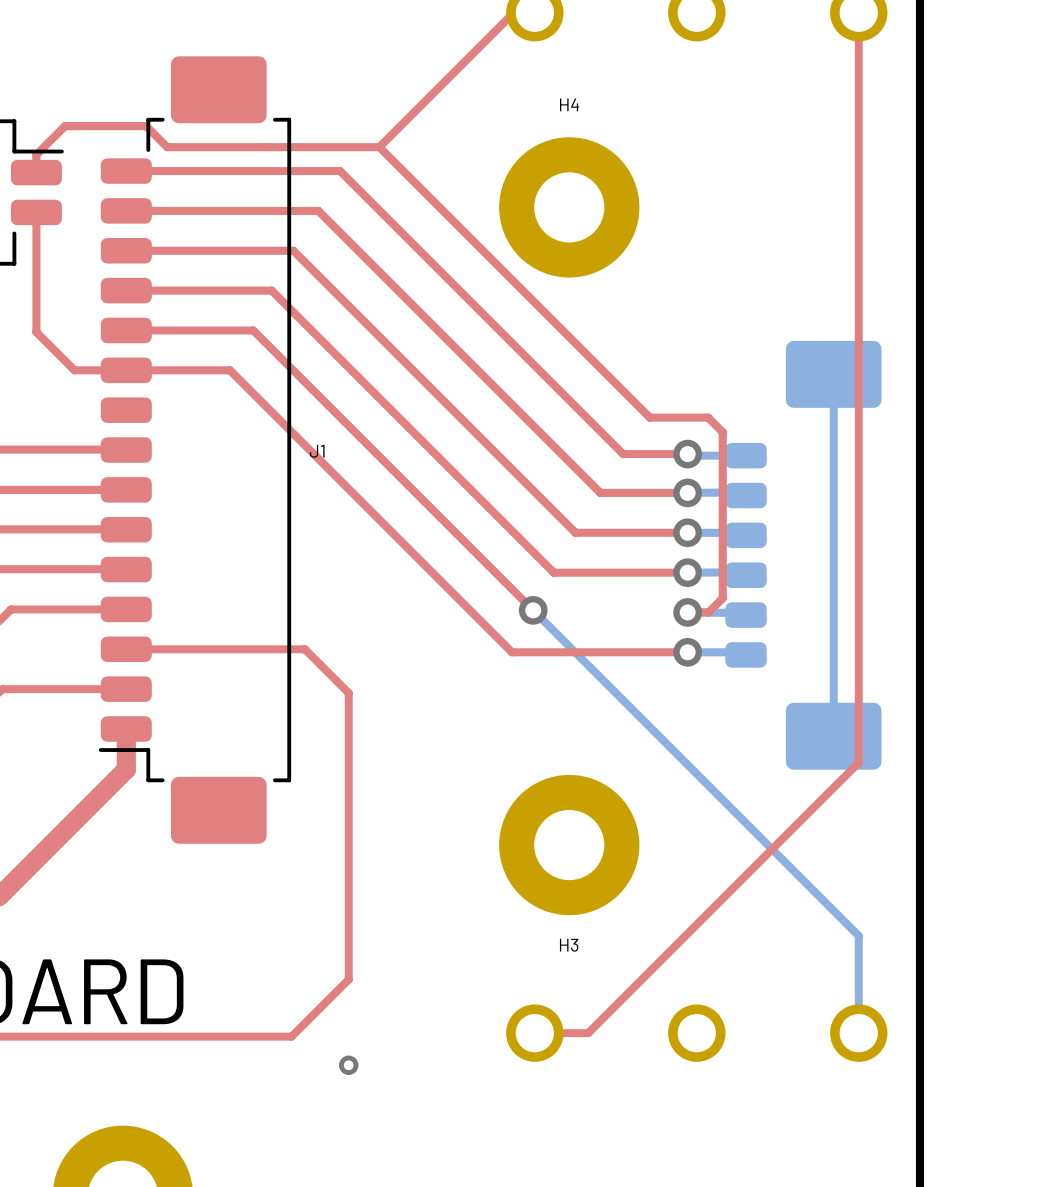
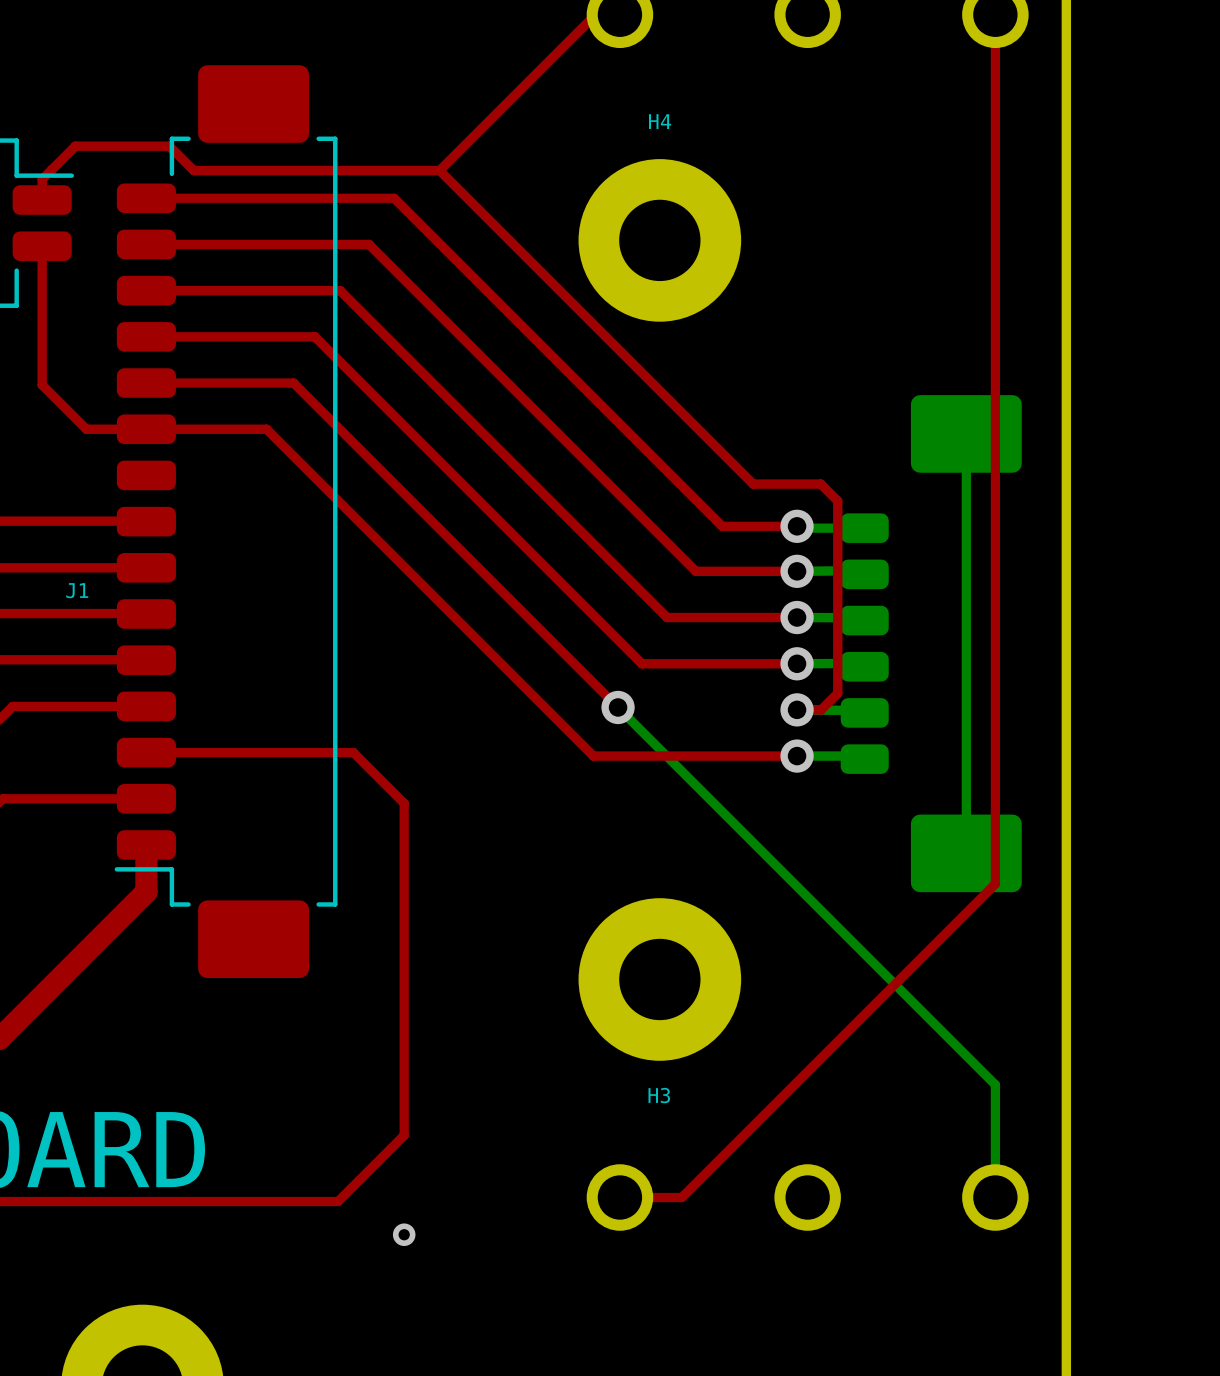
J1 name position: J1 (317, 451) -> J1 (77, 590)

